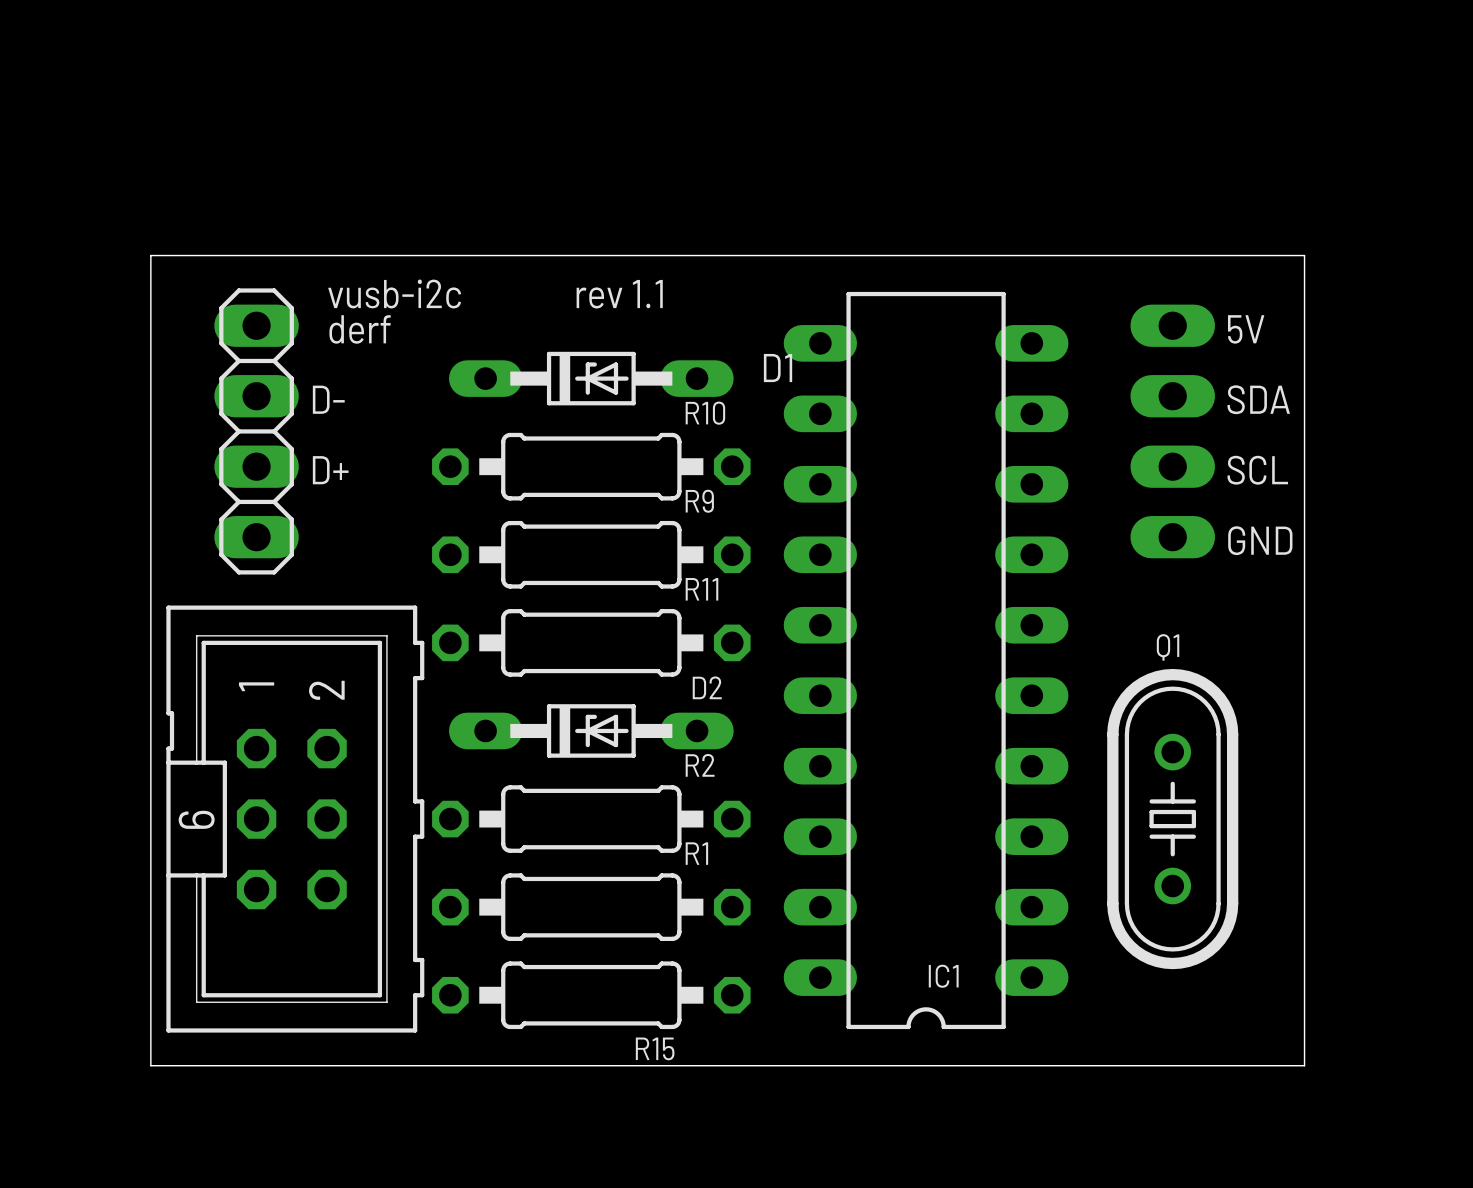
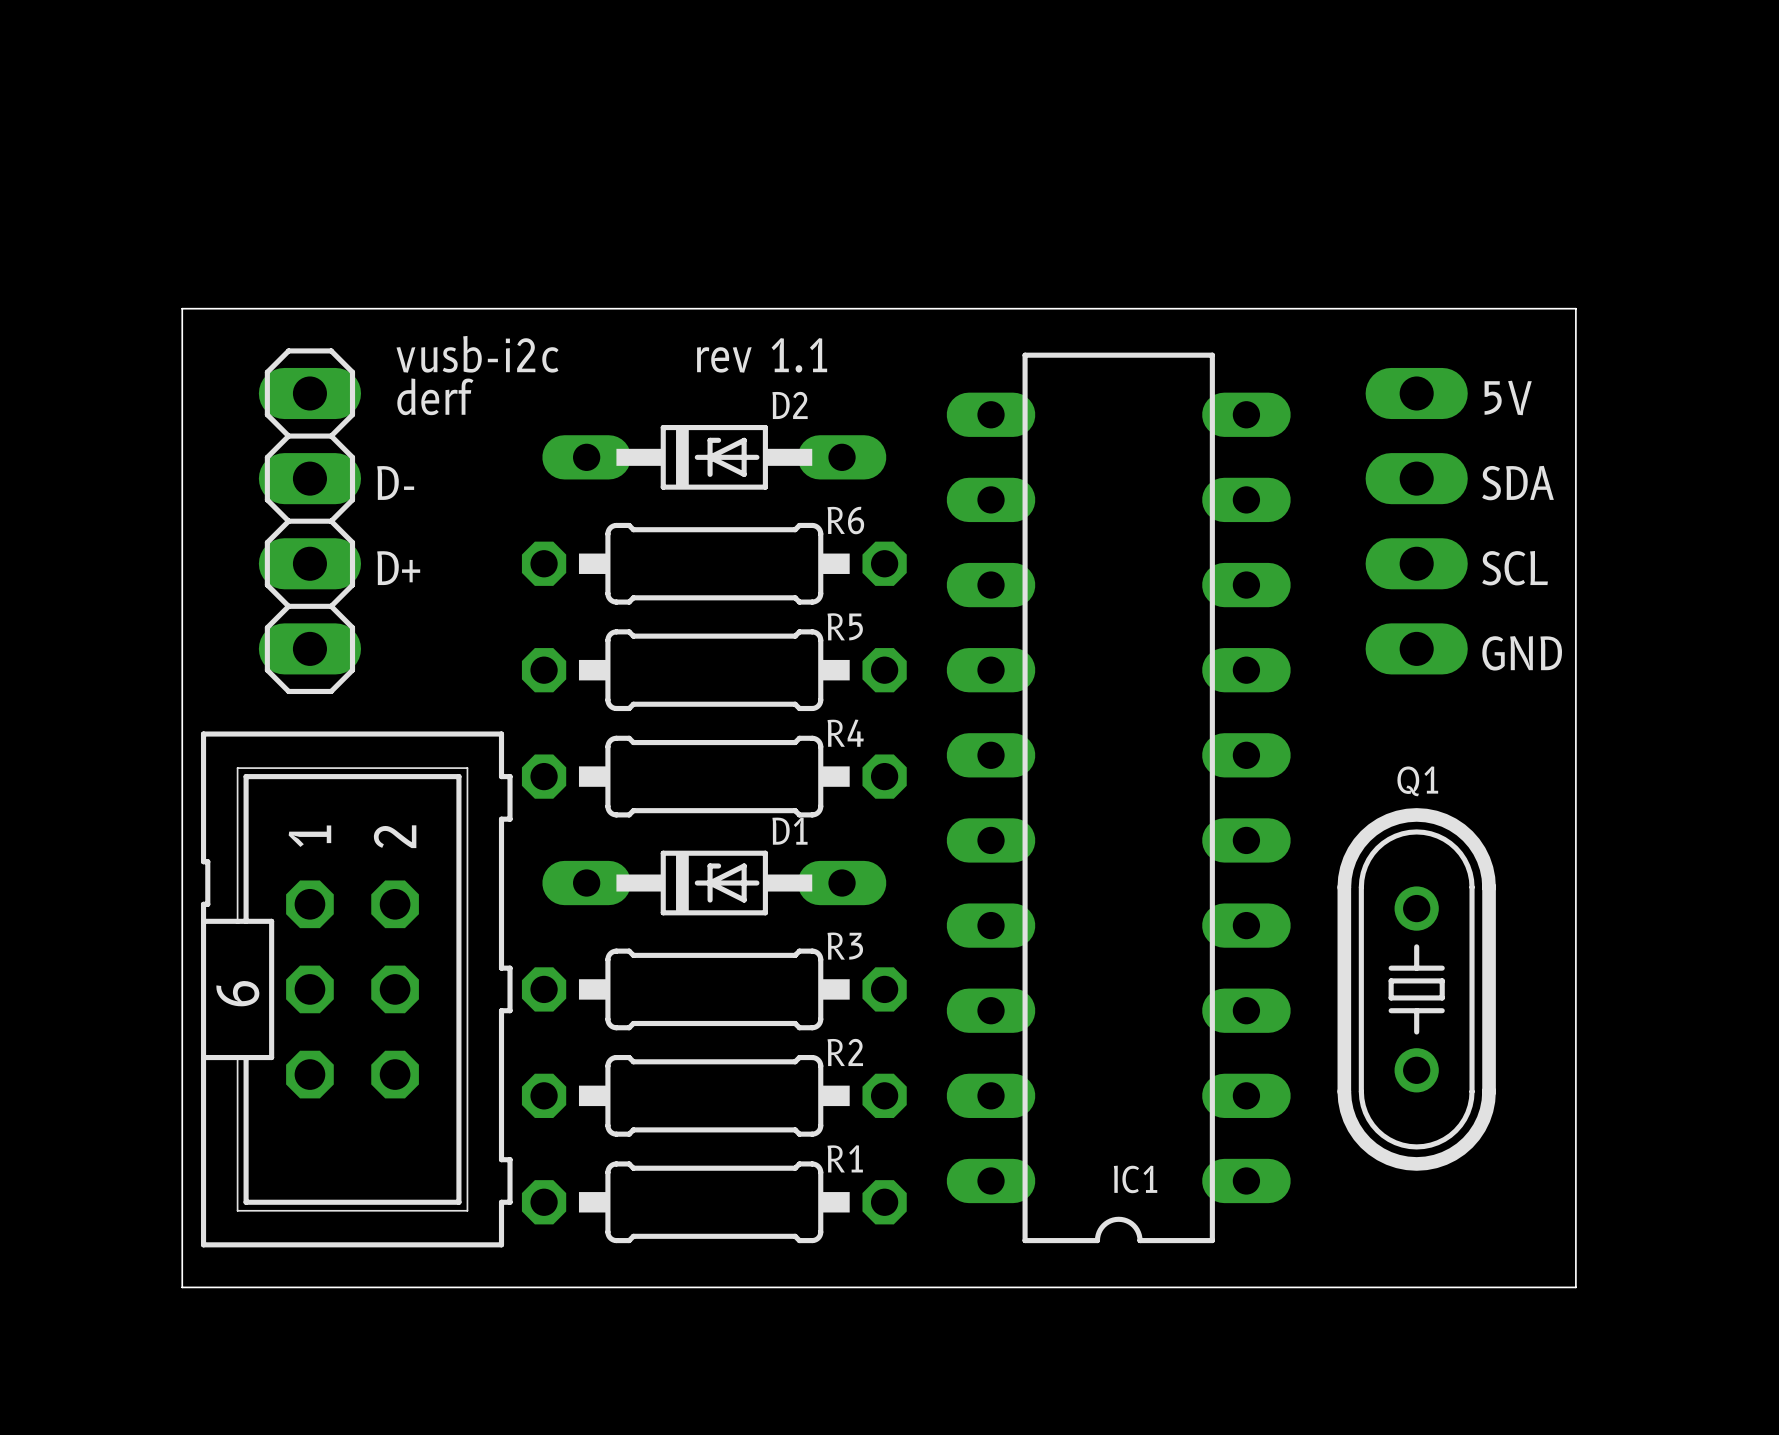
D1 name: D1 (778, 368) -> D2 (790, 405)
R10 name: R10 (705, 413) -> R6 (845, 520)
R9 name: R9 (699, 501) -> R5 (845, 626)
R11 name: R11 (701, 589) -> R4 (845, 733)
D2 name: D2 (707, 687) -> D1 (789, 831)
R2 name: R2 (700, 765) -> R3 (845, 946)
R1 name: R1 (696, 853) -> R2 (845, 1052)
R15 name: R15 (655, 1048) -> R1 (845, 1158)

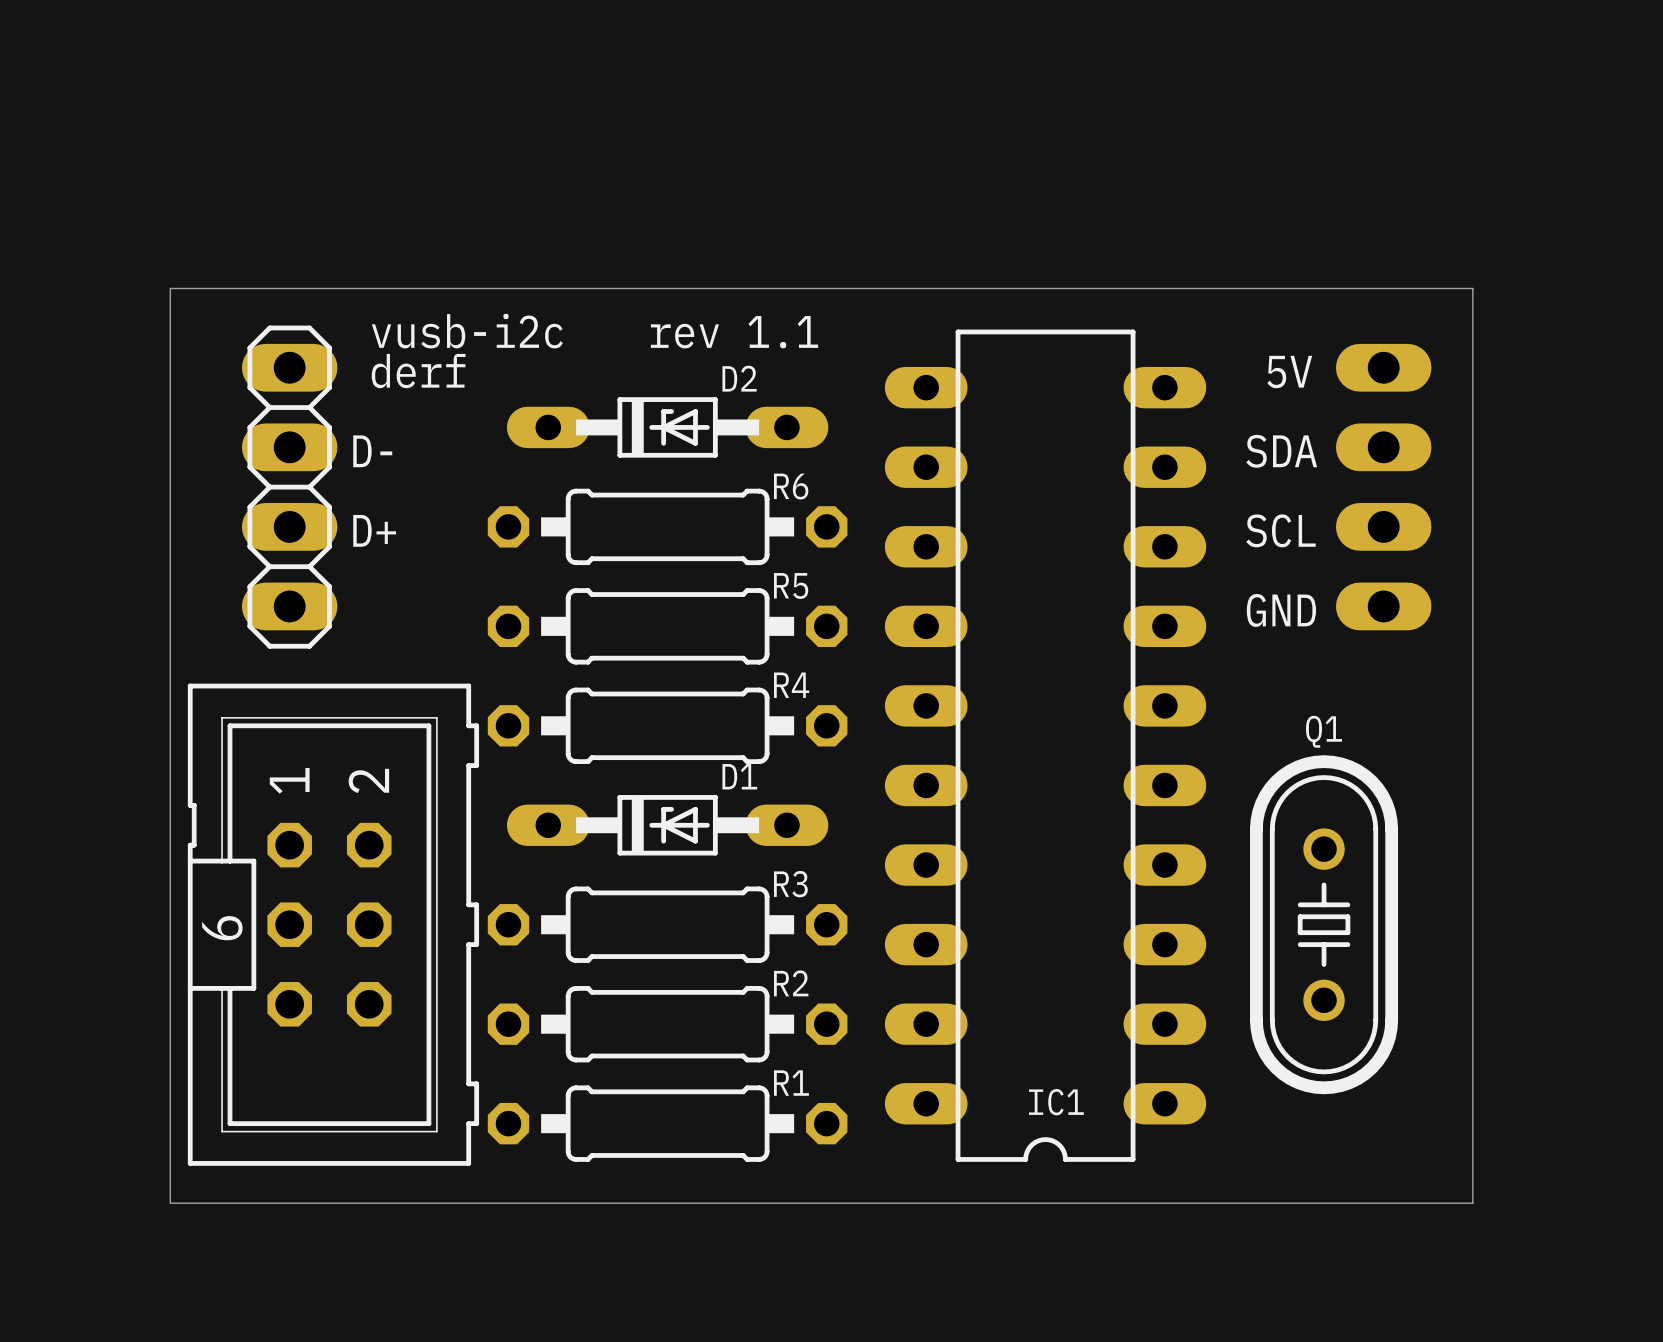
text position: 5V (1508, 397) -> 5V (1289, 372)
text position: SDA (1518, 483) -> SDA (1281, 451)
part position: (1416, 521) -> (1383, 487)
text position: SCL (1515, 568) -> SCL (1280, 530)
text position: GND (1522, 653) -> GND (1281, 610)

